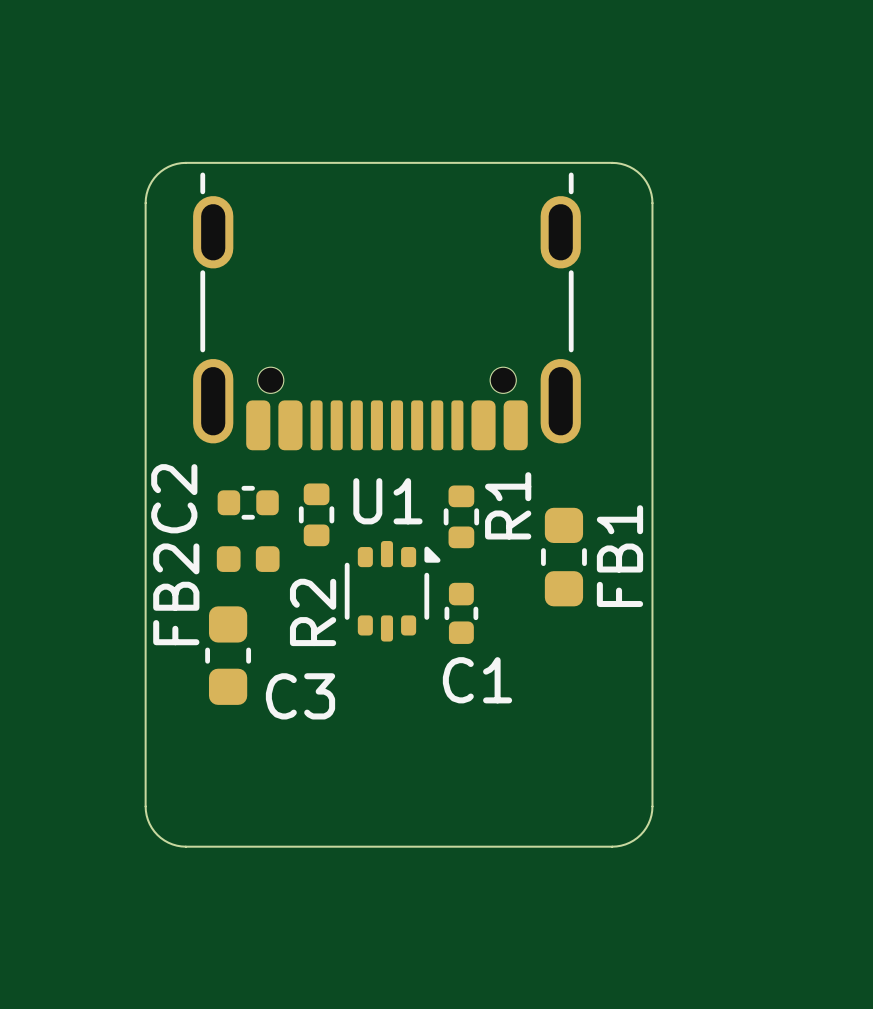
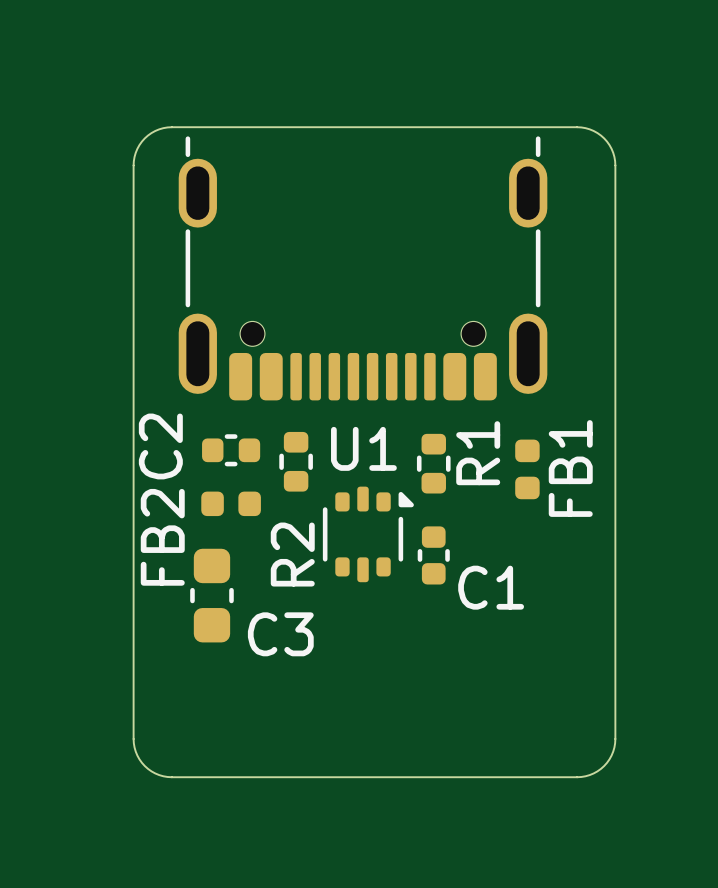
FB1 footprint: [541, 507, 587, 607] -> [515, 439, 540, 500]
C1 name position: C1 (477, 680) -> C1 (491, 587)

